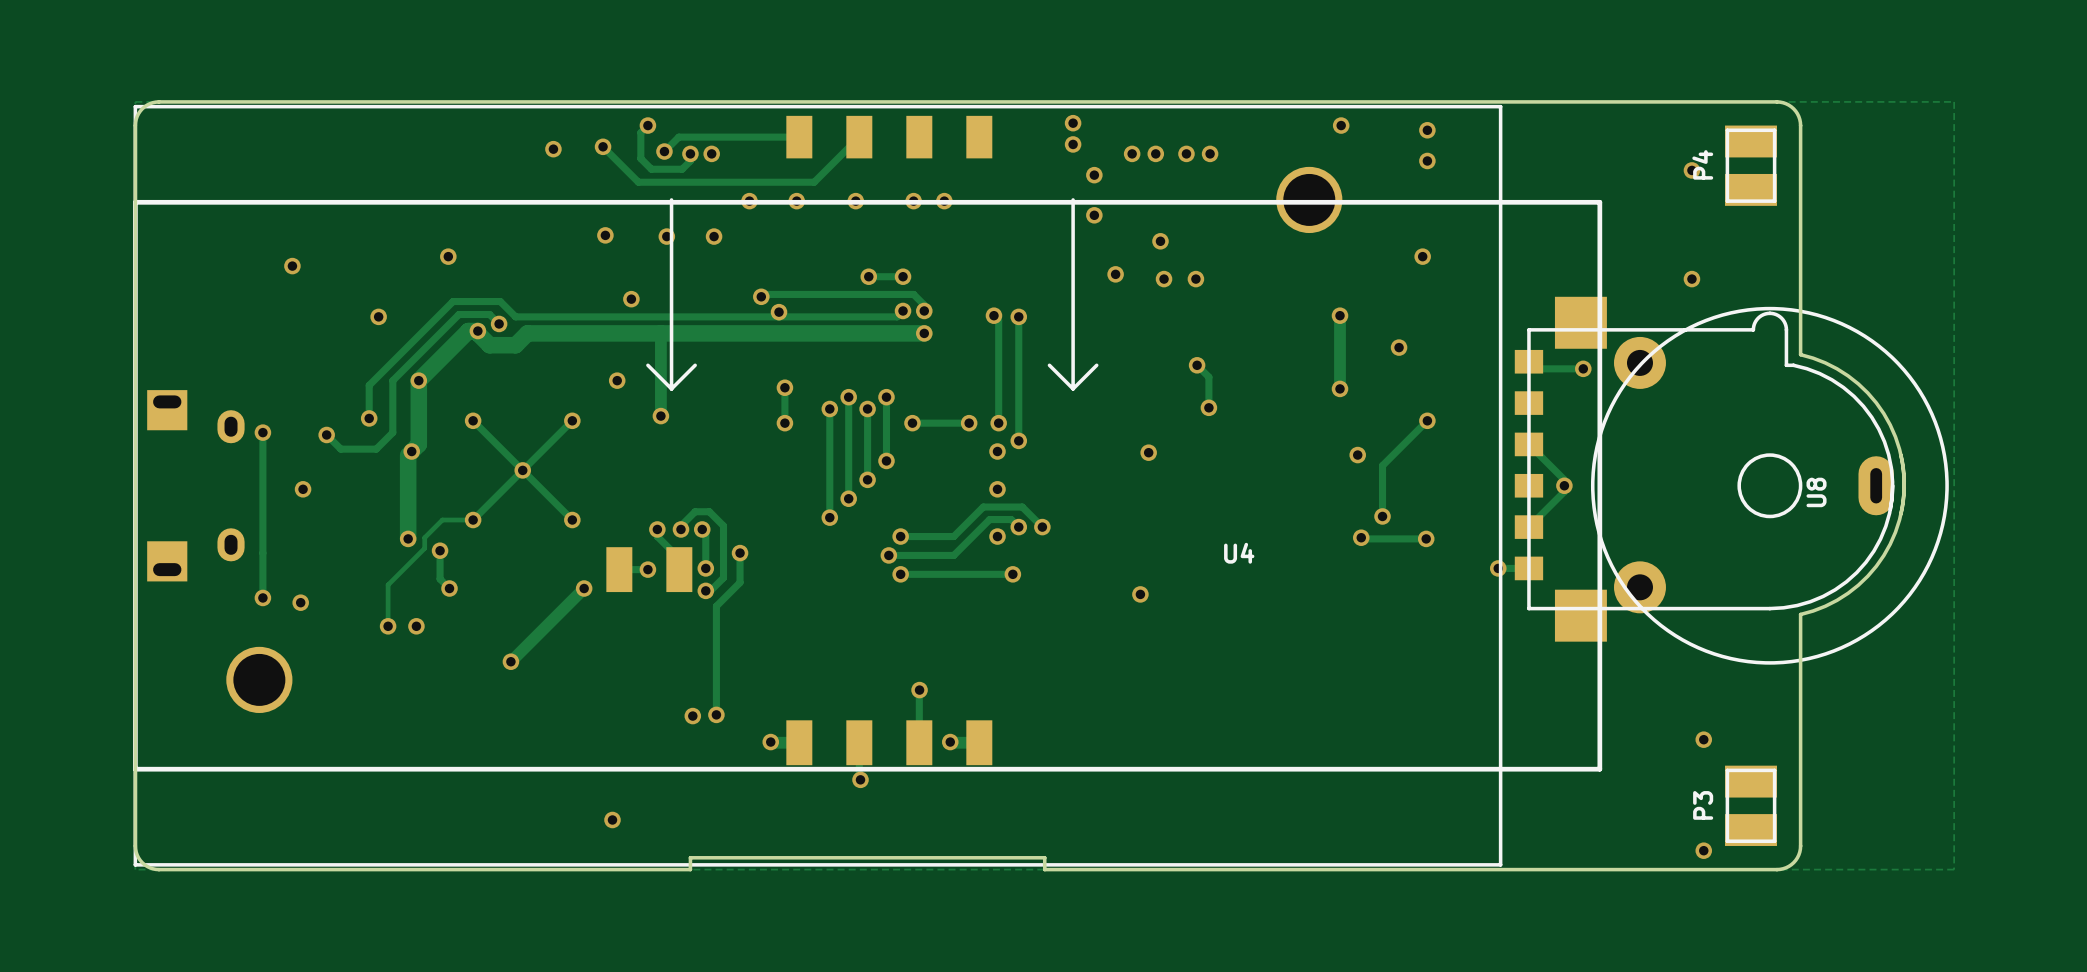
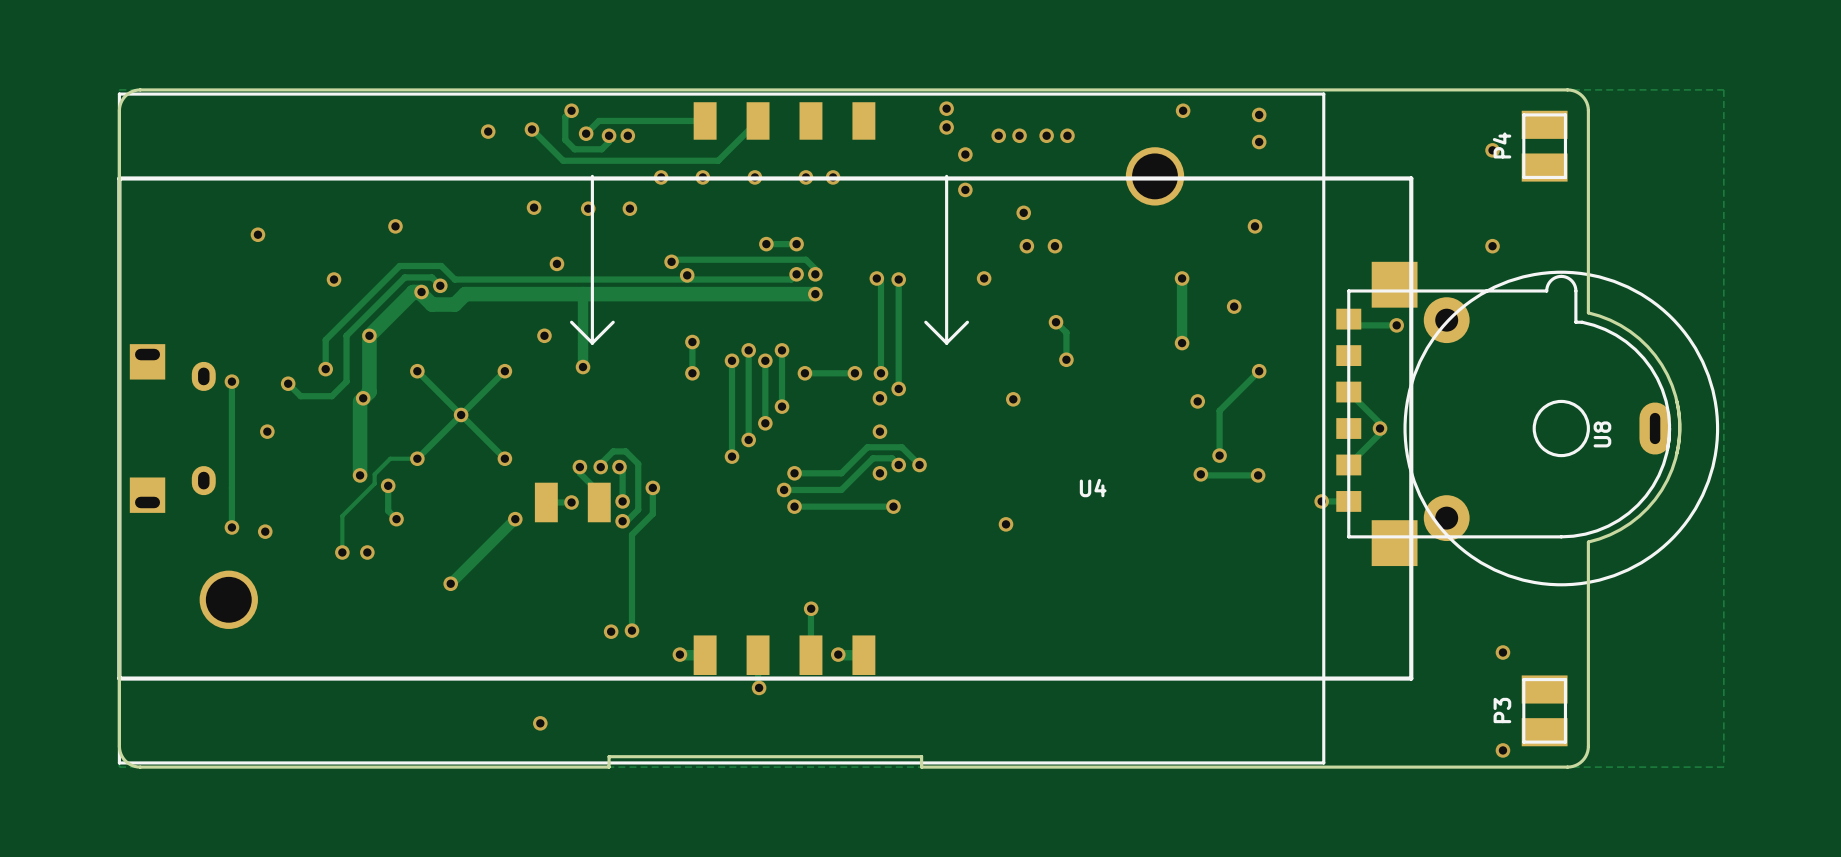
via position: (1115, 274) -> (984, 278)

